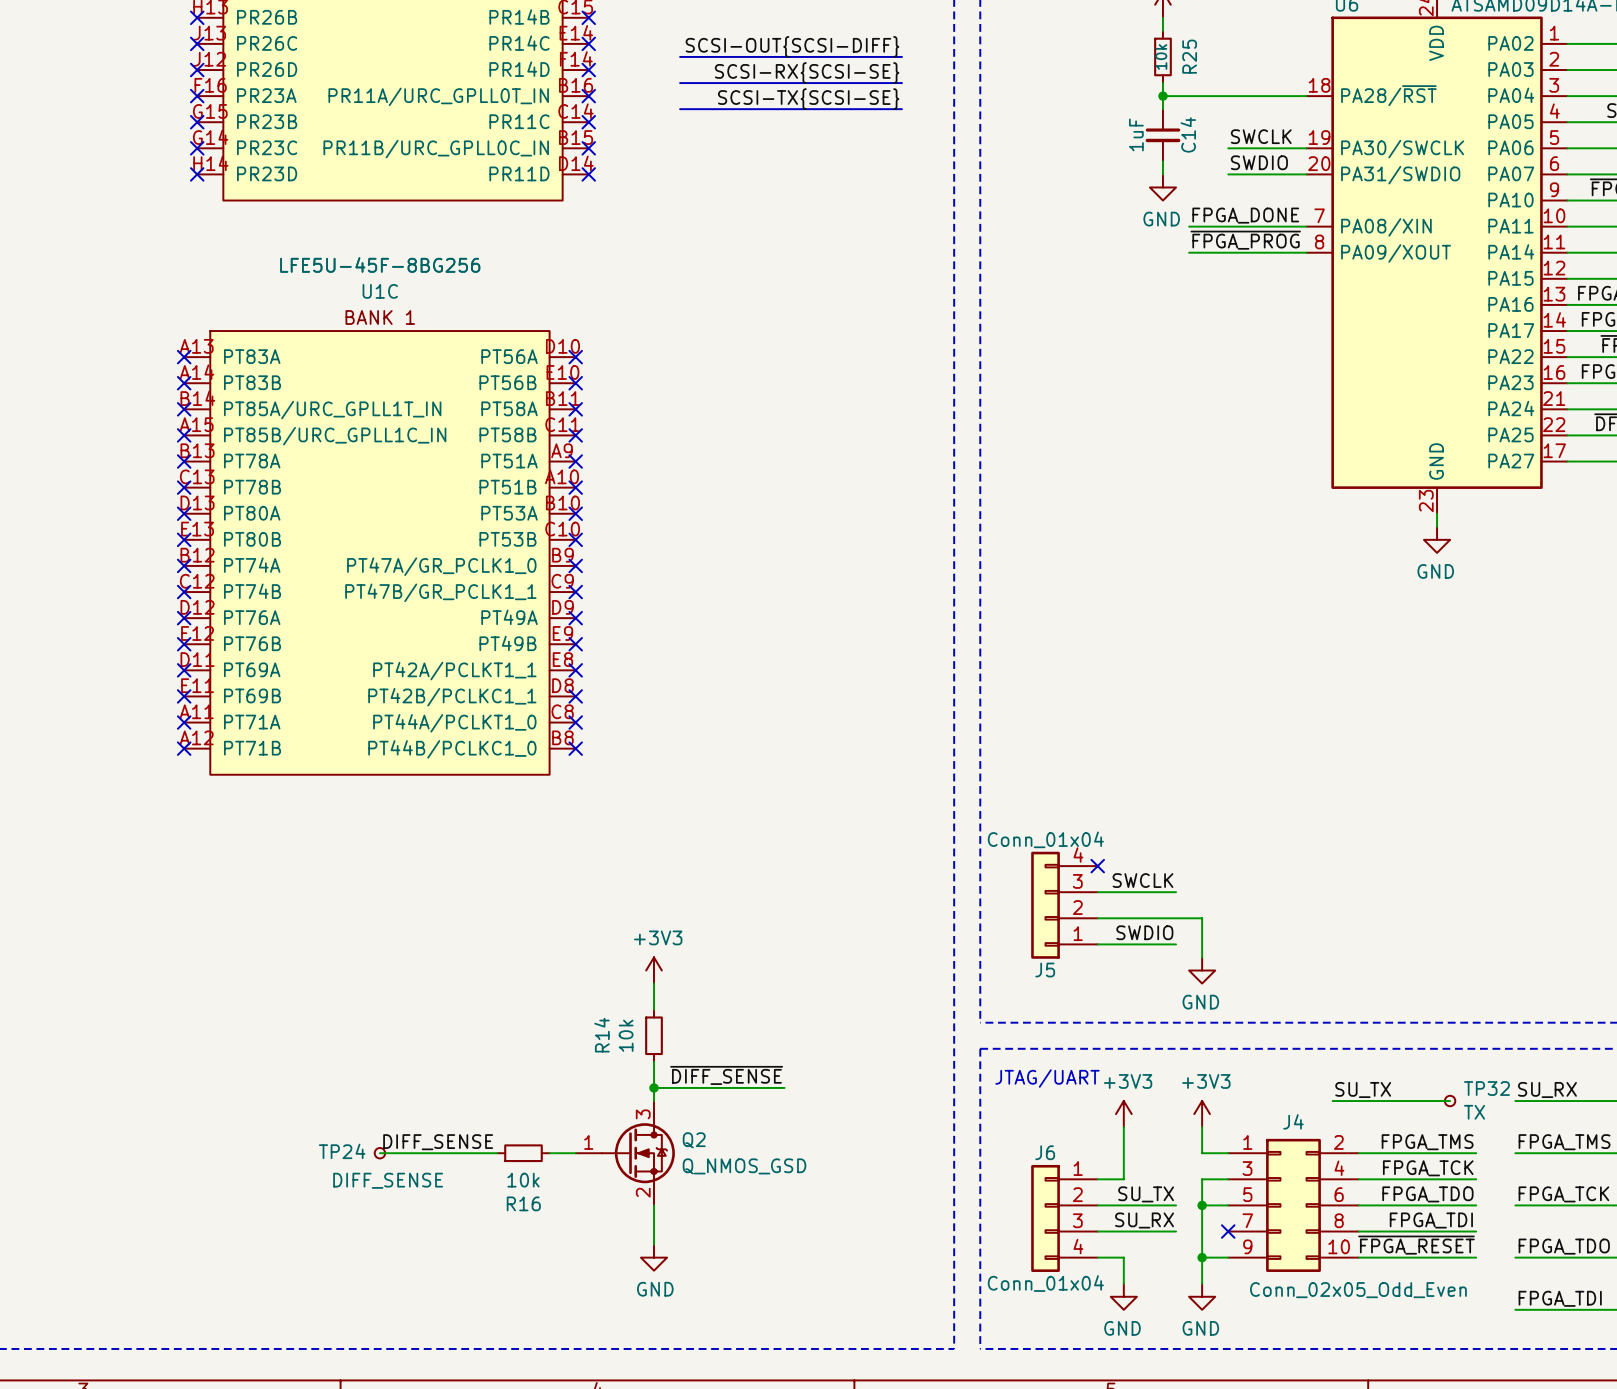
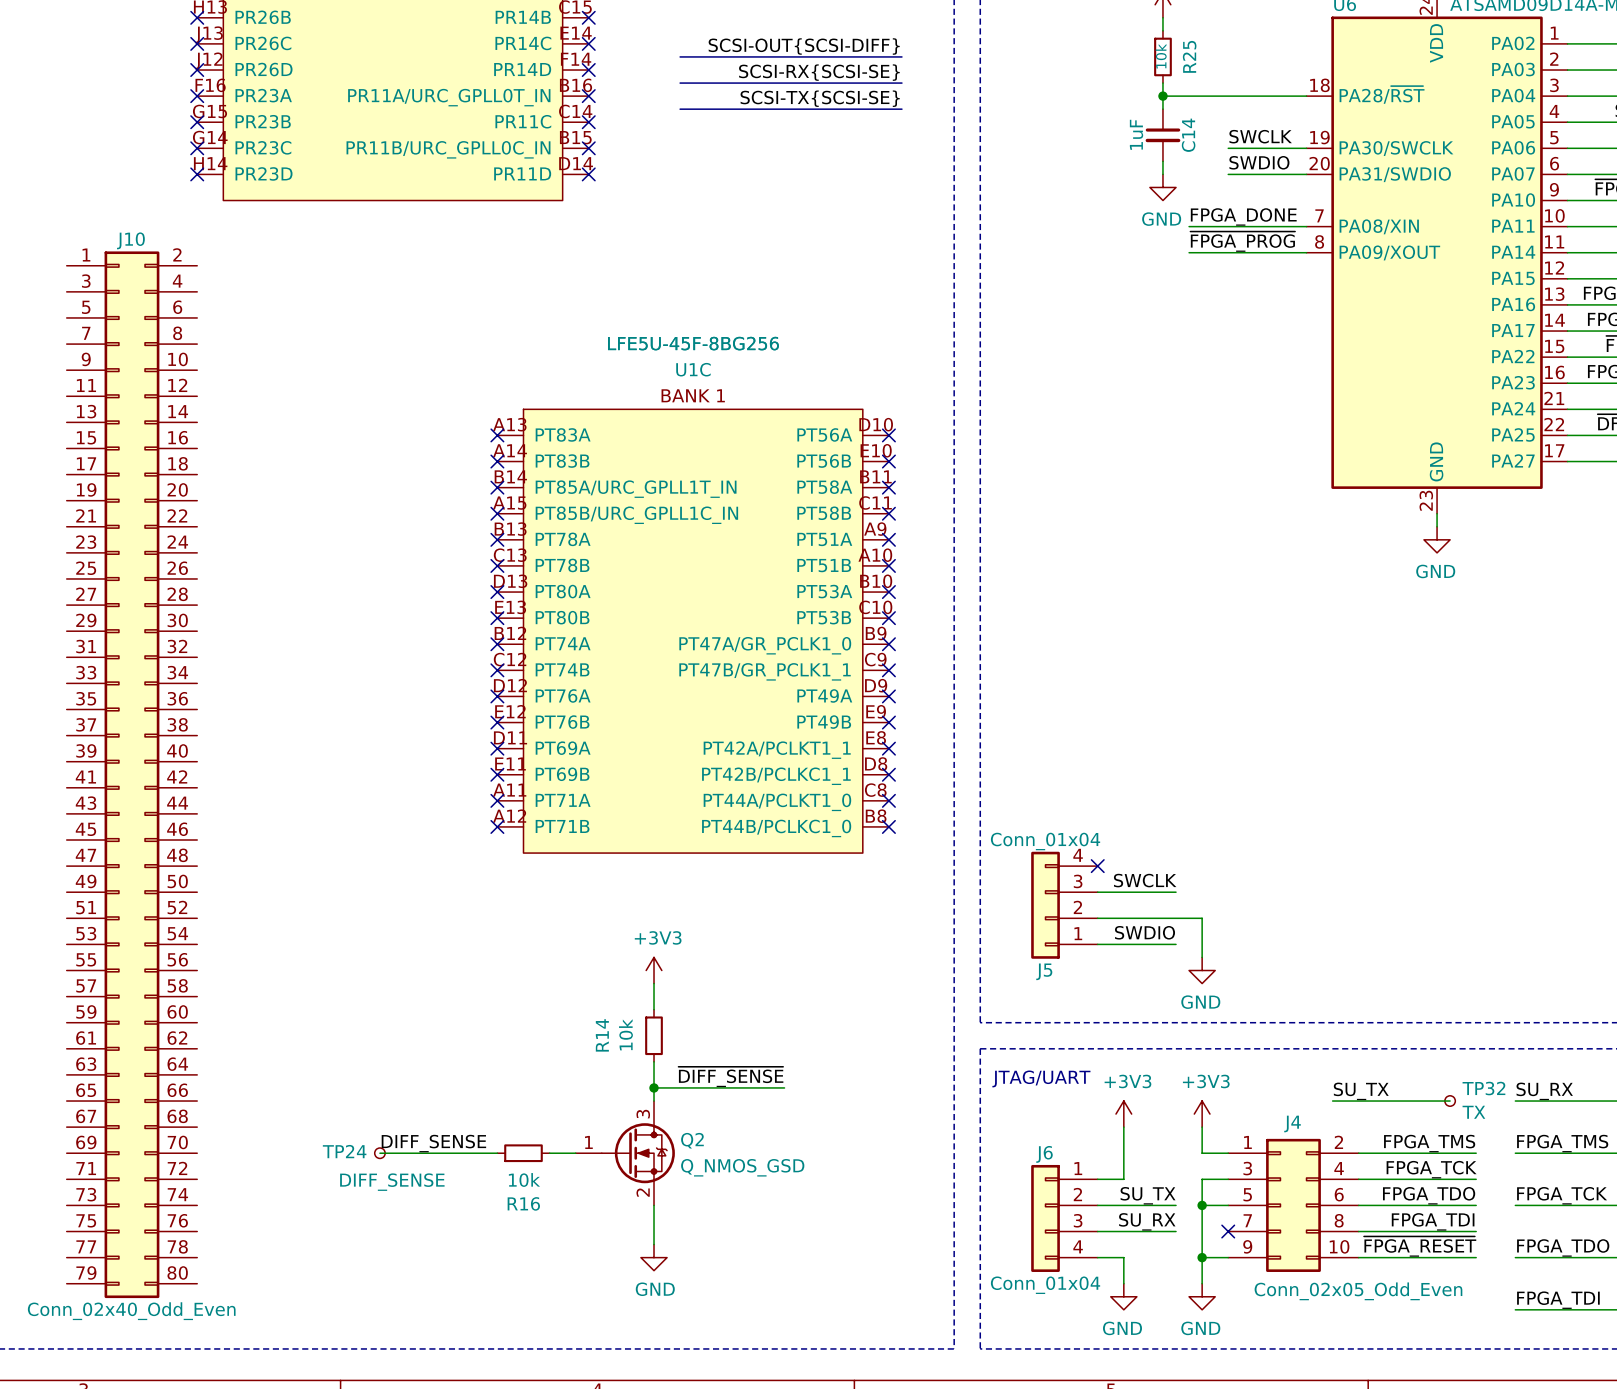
no-connect mark: (184, 357) -> none
no-connect mark: (575, 357) -> none
no-connect mark: (184, 383) -> none
no-connect mark: (575, 383) -> none
no-connect mark: (184, 409) -> none
no-connect mark: (575, 409) -> none
no-connect mark: (184, 435) -> none
no-connect mark: none -> (497, 435)
no-connect mark: (575, 435) -> none
no-connect mark: none -> (888, 435)
no-connect mark: (184, 461) -> none
no-connect mark: none -> (497, 461)
no-connect mark: (575, 461) -> none
no-connect mark: none -> (888, 461)
no-connect mark: (184, 487) -> none
no-connect mark: none -> (497, 487)
no-connect mark: (575, 487) -> none
no-connect mark: none -> (888, 487)
no-connect mark: (184, 513) -> none
no-connect mark: none -> (497, 513)
no-connect mark: (575, 513) -> none
no-connect mark: none -> (888, 513)
no-connect mark: (184, 539) -> none
no-connect mark: none -> (497, 539)
no-connect mark: (575, 539) -> none
no-connect mark: none -> (888, 539)
U1C position: (379, 552) -> (693, 631)
no-connect mark: (184, 565) -> none
no-connect mark: none -> (497, 565)
no-connect mark: (575, 565) -> none
no-connect mark: none -> (888, 565)
no-connect mark: (184, 592) -> none
no-connect mark: none -> (497, 592)
no-connect mark: (575, 592) -> none
no-connect mark: none -> (888, 592)
no-connect mark: (184, 618) -> none
no-connect mark: none -> (497, 618)
no-connect mark: (575, 618) -> none
no-connect mark: none -> (888, 618)
no-connect mark: (184, 644) -> none
no-connect mark: none -> (497, 644)
no-connect mark: (575, 644) -> none
no-connect mark: none -> (888, 644)
no-connect mark: (184, 670) -> none
no-connect mark: none -> (497, 670)
no-connect mark: (575, 670) -> none
no-connect mark: none -> (888, 670)
no-connect mark: (184, 696) -> none
no-connect mark: none -> (497, 696)
no-connect mark: (575, 696) -> none
no-connect mark: none -> (888, 696)
no-connect mark: (184, 722) -> none
no-connect mark: none -> (497, 722)
no-connect mark: (575, 722) -> none
no-connect mark: none -> (888, 722)
no-connect mark: (184, 748) -> none
no-connect mark: none -> (497, 748)
no-connect mark: (575, 748) -> none
no-connect mark: none -> (888, 748)
J10: none -> Conn_02x40_Odd_Even (131, 774)
no-connect mark: none -> (497, 774)
no-connect mark: none -> (888, 774)
no-connect mark: none -> (497, 800)
no-connect mark: none -> (888, 800)
no-connect mark: none -> (497, 826)
no-connect mark: none -> (888, 826)

